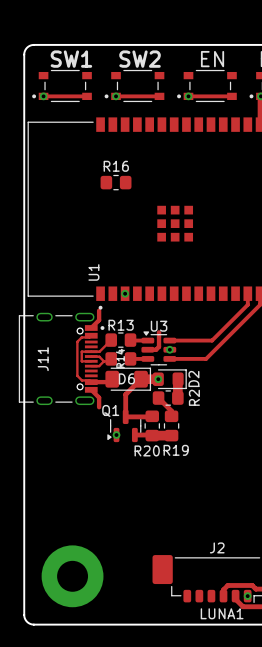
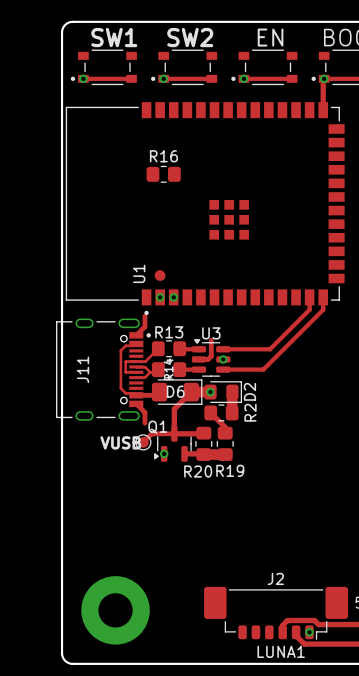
track: none -> (159, 275) (160, 275)
via: none -> (160, 297)
track: none -> (174, 433) (151, 433) (143, 442)
part: none -> (143, 442)
text: none -> VUSB (120, 442)

